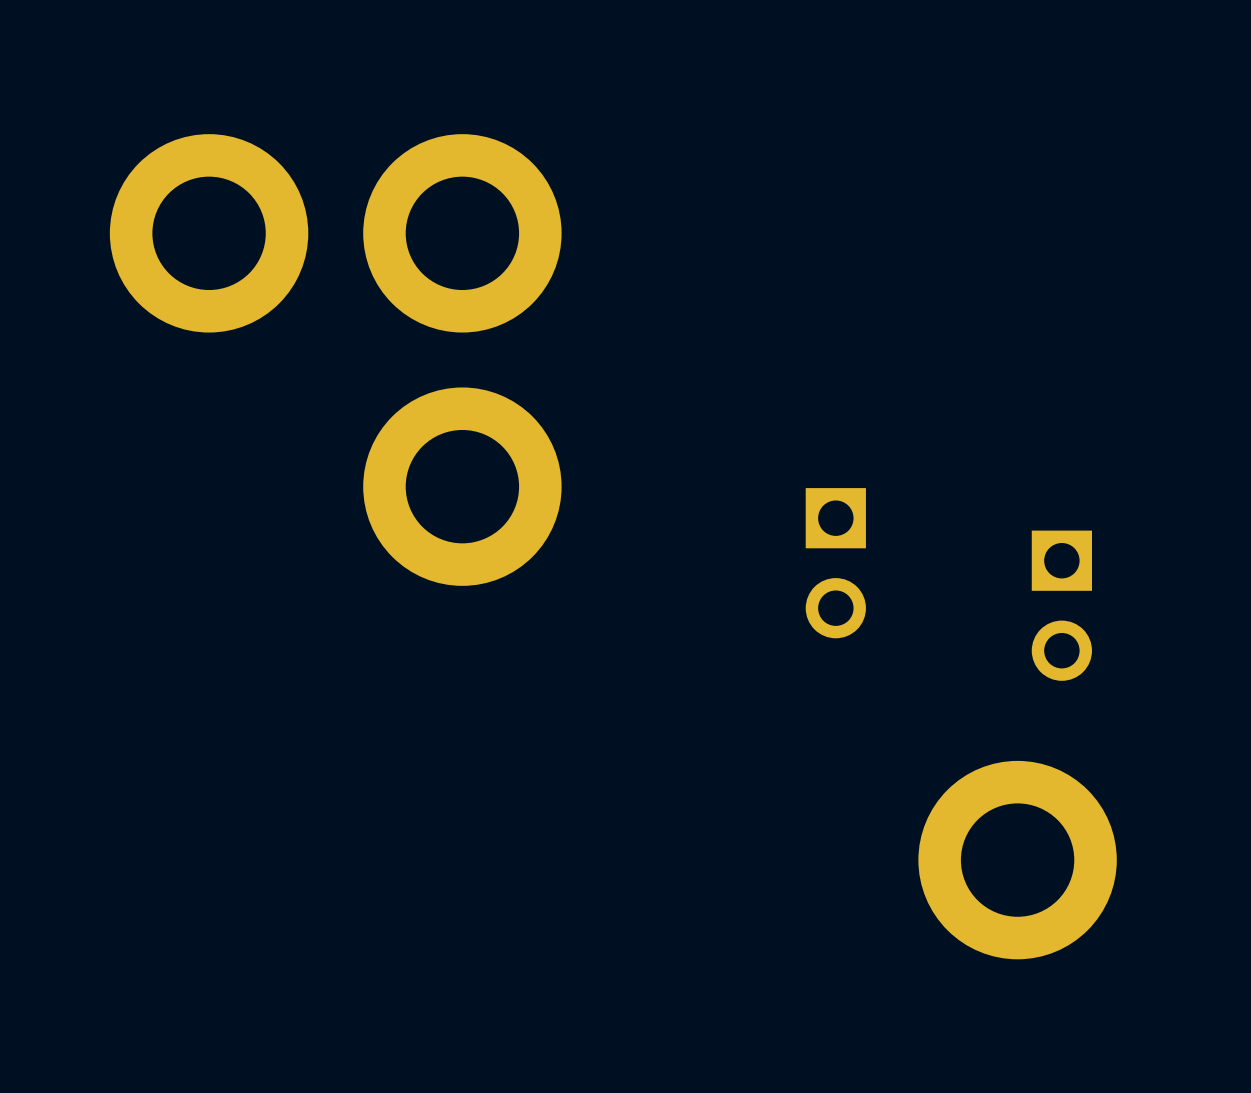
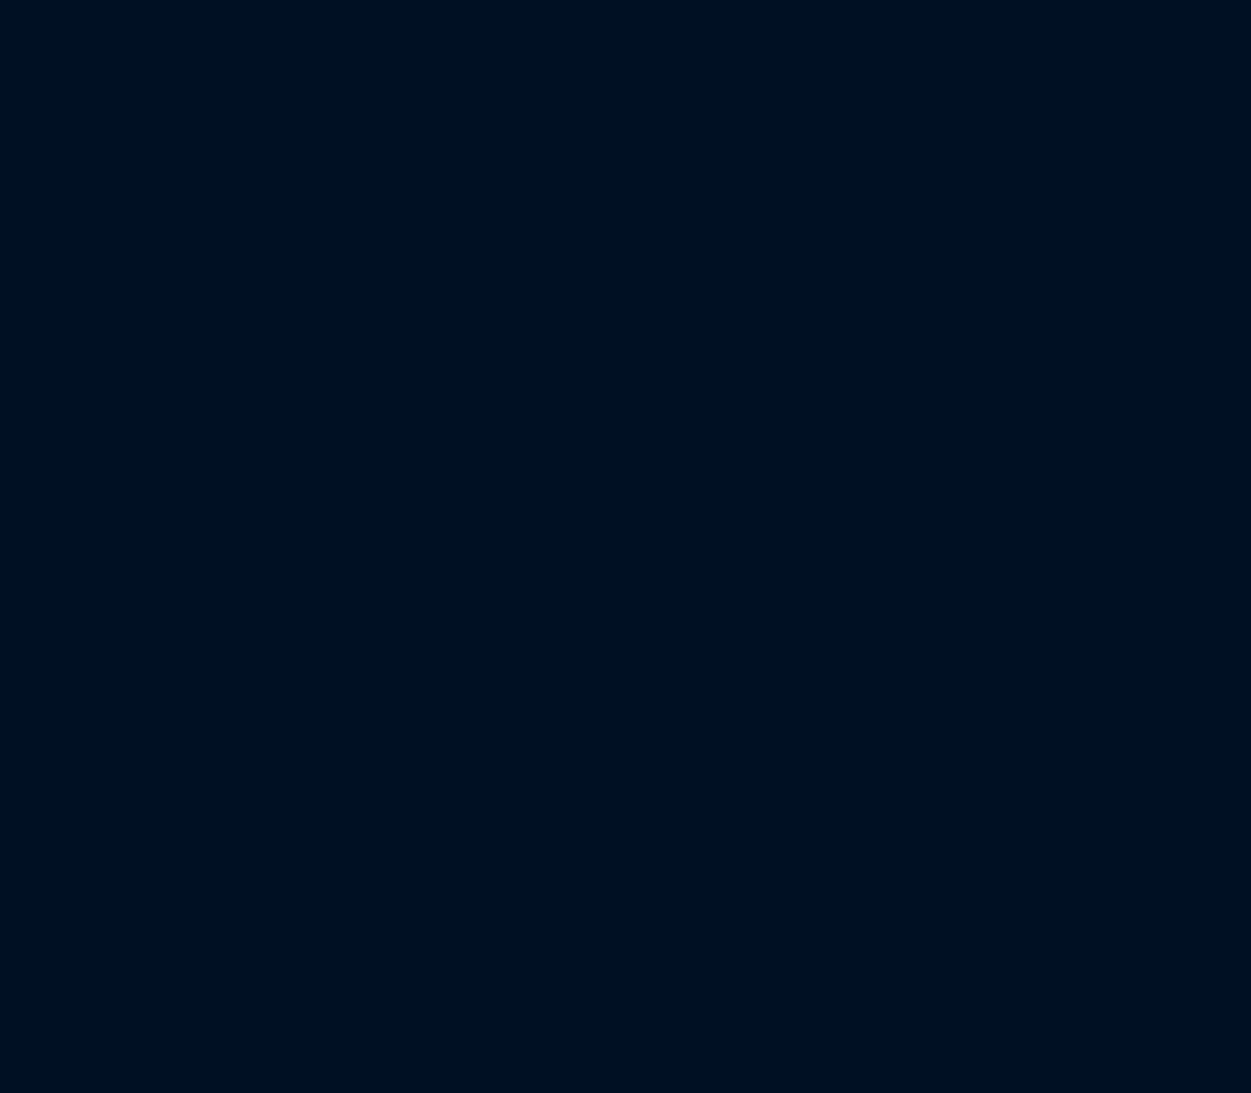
part: (209, 233) -> none
part: (462, 233) -> none
part: (462, 486) -> none
part: (835, 563) -> none
part: (1061, 605) -> none
part: (1017, 860) -> none

